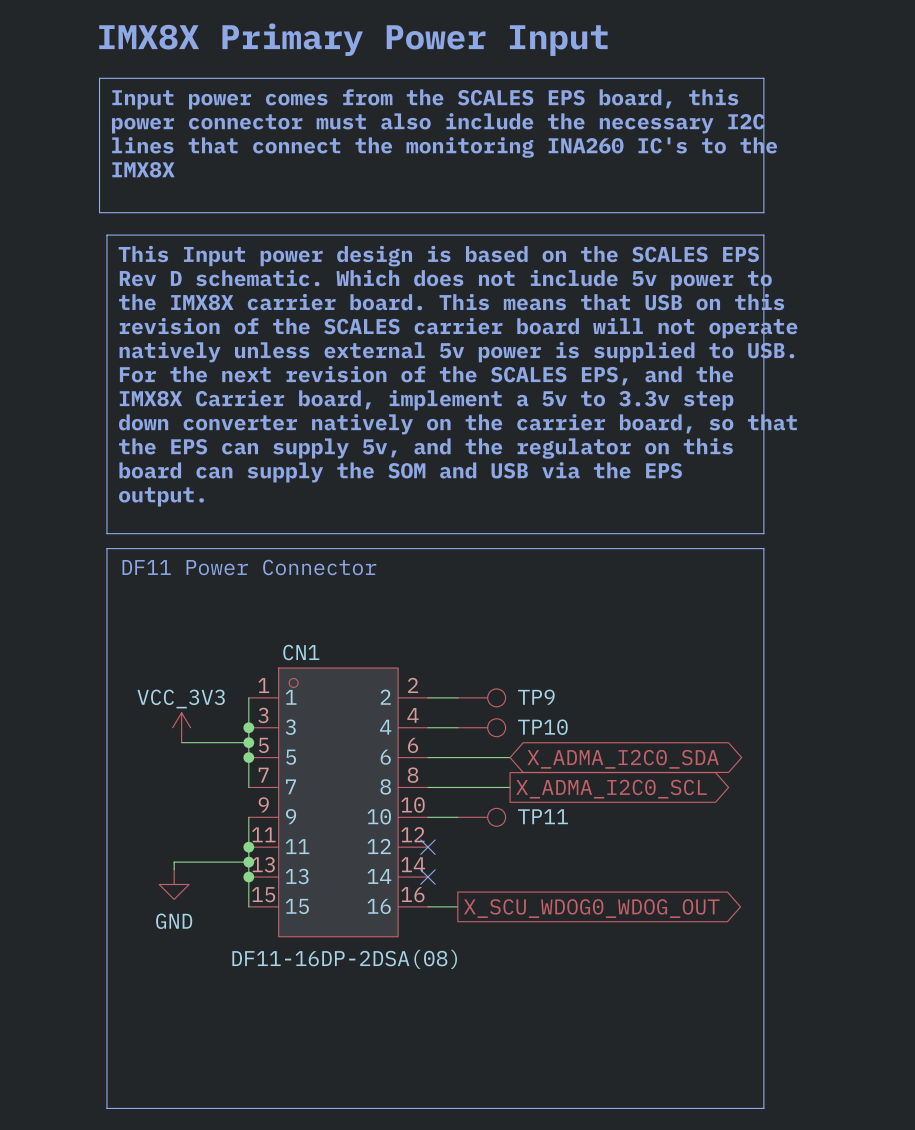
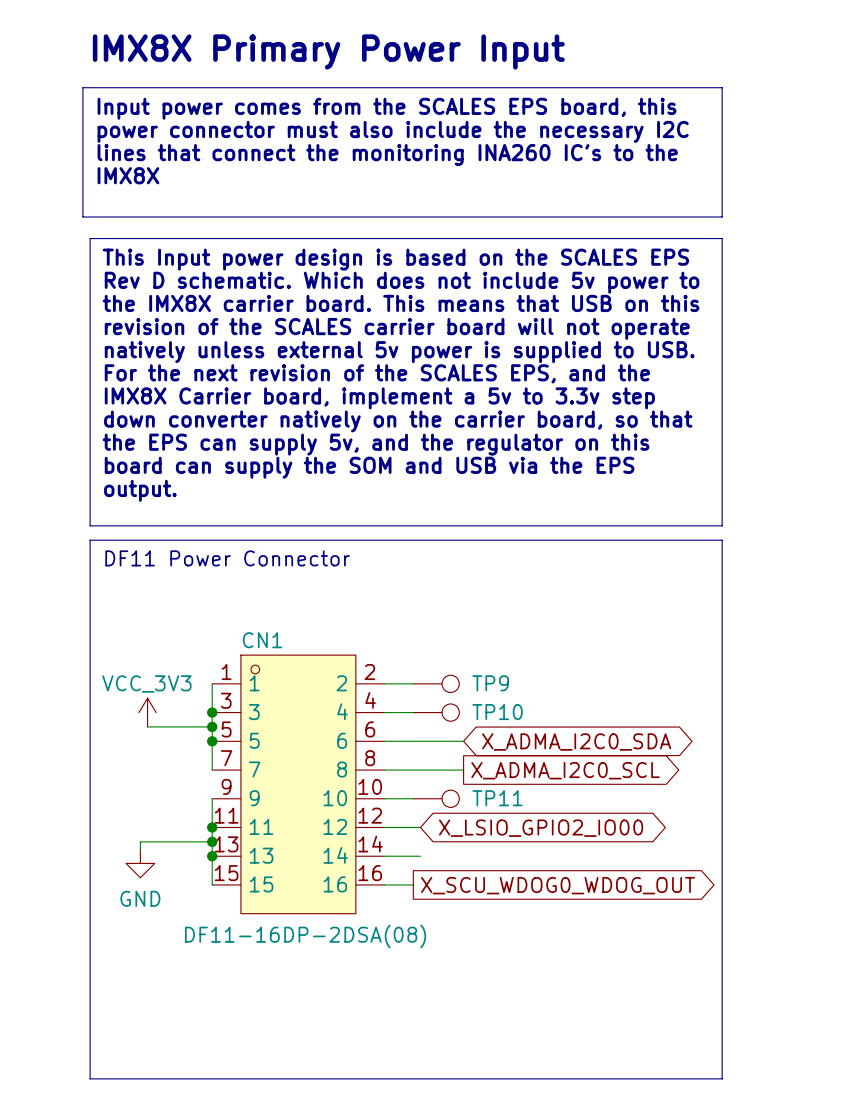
text position: IMX8X Primary Power Input (353, 39) -> IMX8X Primary Power Input (328, 51)
line: (114, 78) (99, 78) (99, 212) (114, 212) -> (82, 87) (82, 217)
line: (763, 78) (763, 212) -> (707, 87) (722, 87) (722, 217) (707, 217)
text position: Input power comes from the SCALES EPS board, this (425, 99) -> Input power comes from the SCALES EPS board, this (386, 108)
text position: power connector must also include the necessary I2C (438, 123) -> power connector must also include the necessary I2C (393, 131)
text position: lines that connect the monitoring INA260 IC's to the (444, 147) -> lines that connect the monitoring INA260 IC's to the (387, 155)
text position: IMX8X (143, 169) -> IMX8X (128, 175)
line: (121, 235) (106, 235) (106, 533) (121, 533) -> (90, 238) (90, 525)
line: (763, 235) (763, 533) -> (707, 238) (722, 238) (722, 525) (707, 525)
text position: This Input power design is based on the SCALES EPS (438, 256) -> This Input power design is based on the SCALES EPS (395, 259)
text position: Rev D schematic. Which does not include 5v power to (445, 280) -> Rev D schematic. Which does not include 5v power to (402, 282)
text position: the IMX8X carrier board. This means that USB on this (451, 302) -> the IMX8X carrier board. This means that USB on this (401, 303)
text position: revision of the SCALES carrier board will not operate (458, 328) -> revision of the SCALES carrier board will not operate (397, 328)
text position: natively unless external 5v power is supplied to USB. (456, 352) -> natively unless external 5v power is supplied to USB. (399, 352)
text position: For the next revision of the SCALES EPS, and the (426, 375) -> For the next revision of the SCALES EPS, and the (377, 373)
text position: IMX8X Carrier board, implement a 5v to 3.3v step (426, 400) -> IMX8X Carrier board, implement a 5v to 3.3v step (379, 398)
text position: down converter natively on the carrier board, so that (457, 424) -> down converter natively on the carrier board, so that (398, 421)
text position: the EPS can supply 5v, and the regulator on this (425, 448) -> the EPS can supply 5v, and the regulator on this (376, 444)
text position: board can supply the SOM and USB via the EPS (400, 472) -> board can supply the SOM and USB via the EPS (369, 467)
text position: output. (161, 496) -> output. (140, 490)
line: (121, 548) (106, 548) (106, 1108) (121, 1108) -> (90, 540) (90, 1078)
line: (763, 548) (763, 1108) -> (707, 540) (722, 540) (722, 1078) (707, 1078)
text position: DF11 Power Connector (249, 567) -> DF11 Power Connector (227, 558)
wire: none -> (384, 827) (420, 827)
no-connect mark: (427, 847) -> none
global label: none -> X_LSIO_GPIO2_IO00 (541, 828)
wire: none -> (384, 856) (420, 856)
no-connect mark: (427, 877) -> none

